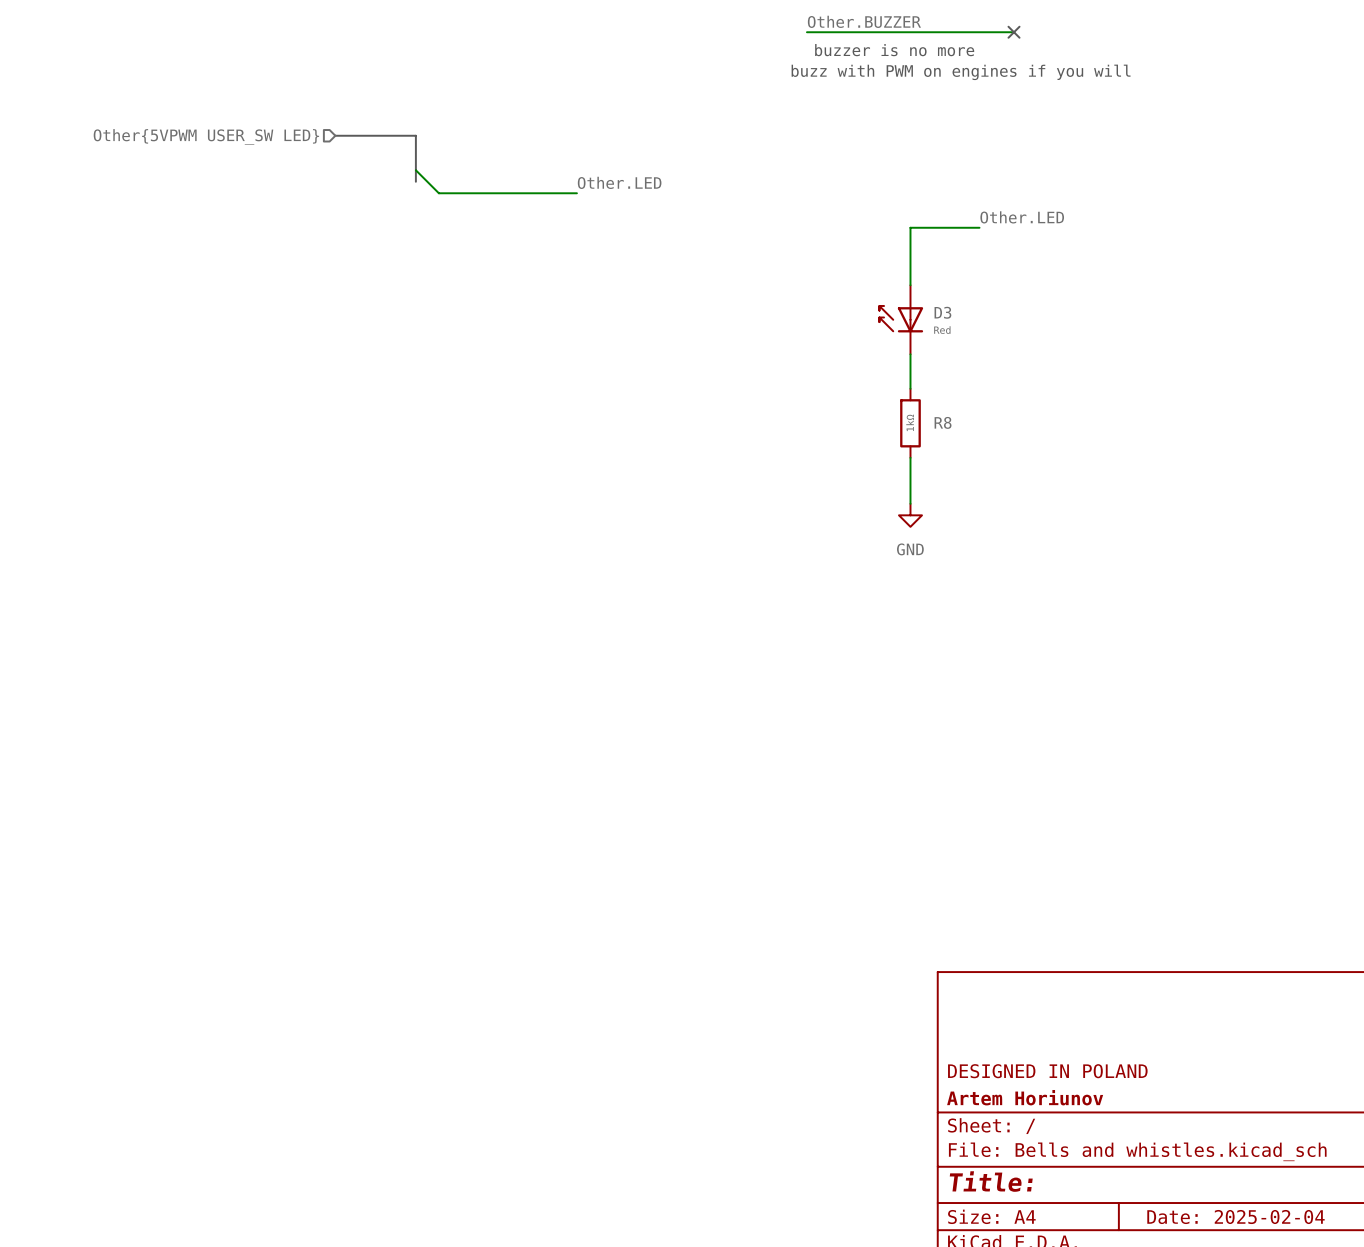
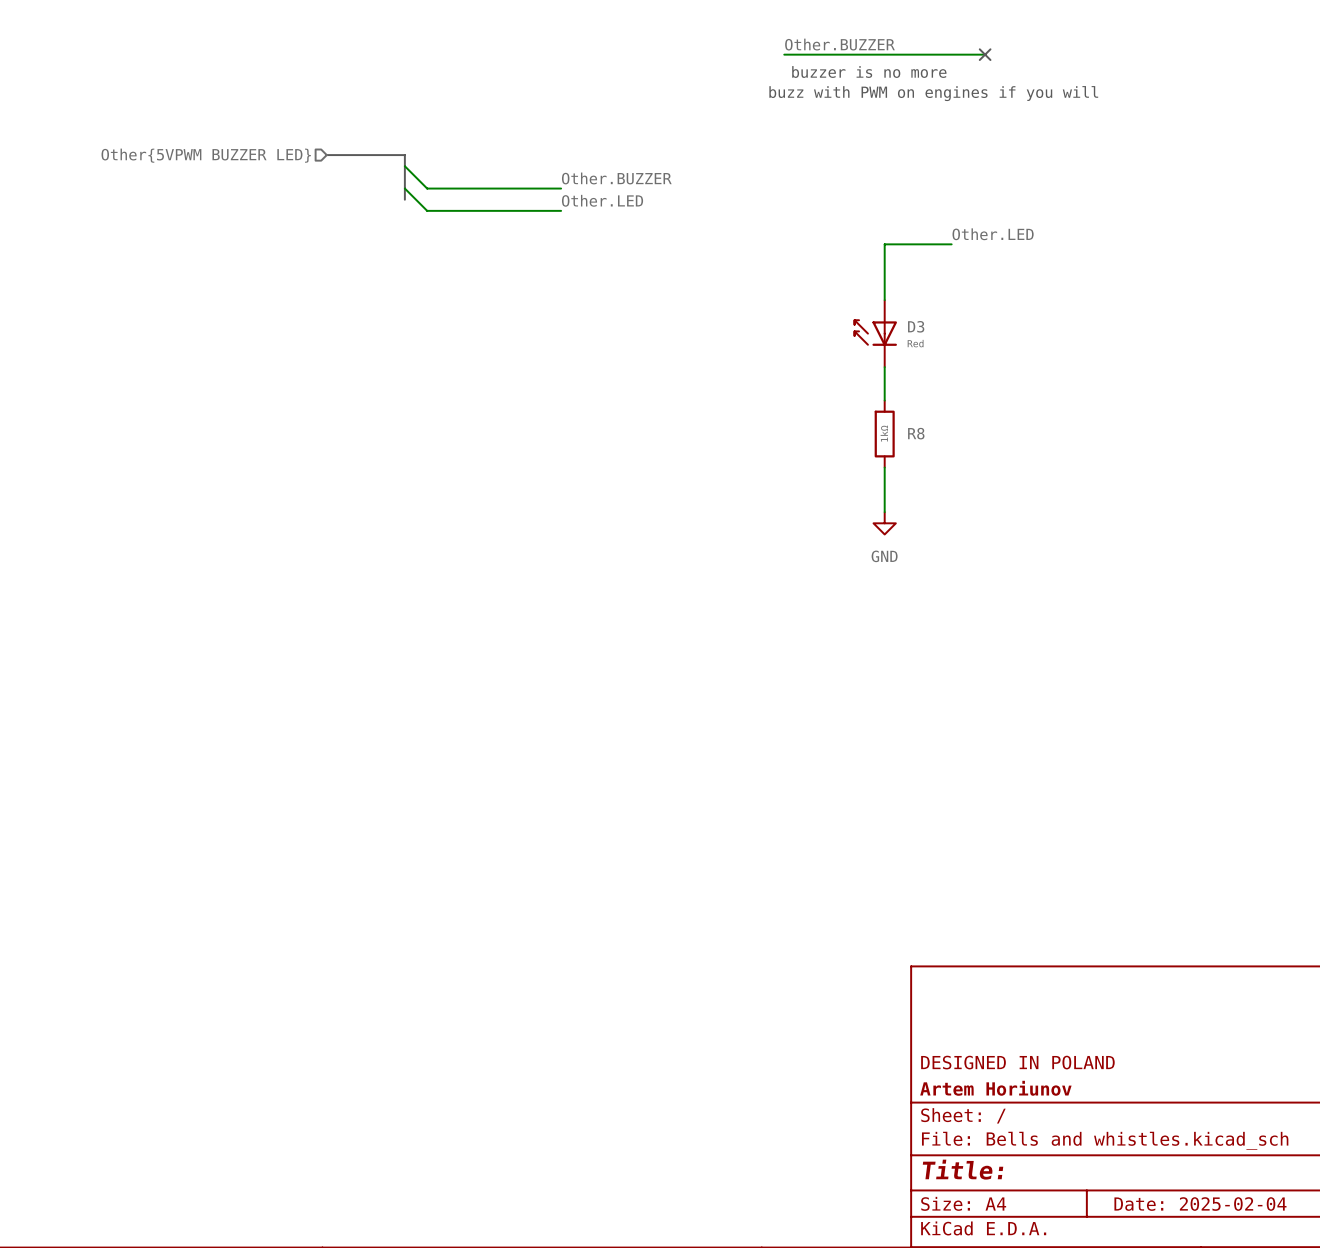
hierarchical label: Other{5VPWM USER_SW LED} (206, 136) -> Other{5VPWM BUZZER LED} (206, 155)
wire: none -> (404, 166) (427, 188) (561, 188)
label: none -> Other.BUZZER (616, 178)

